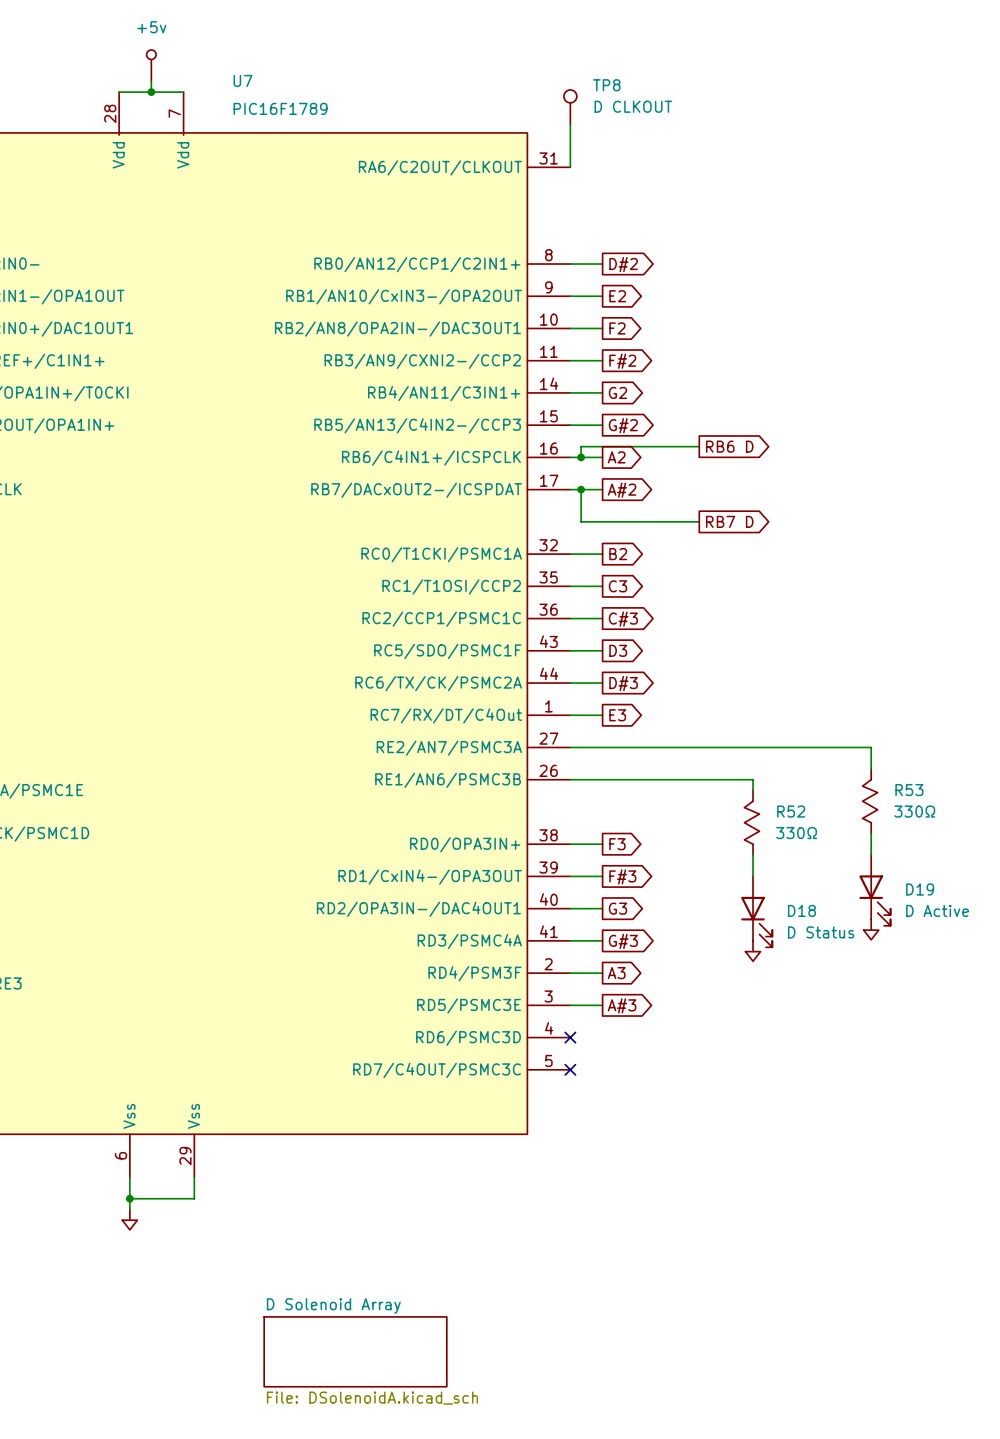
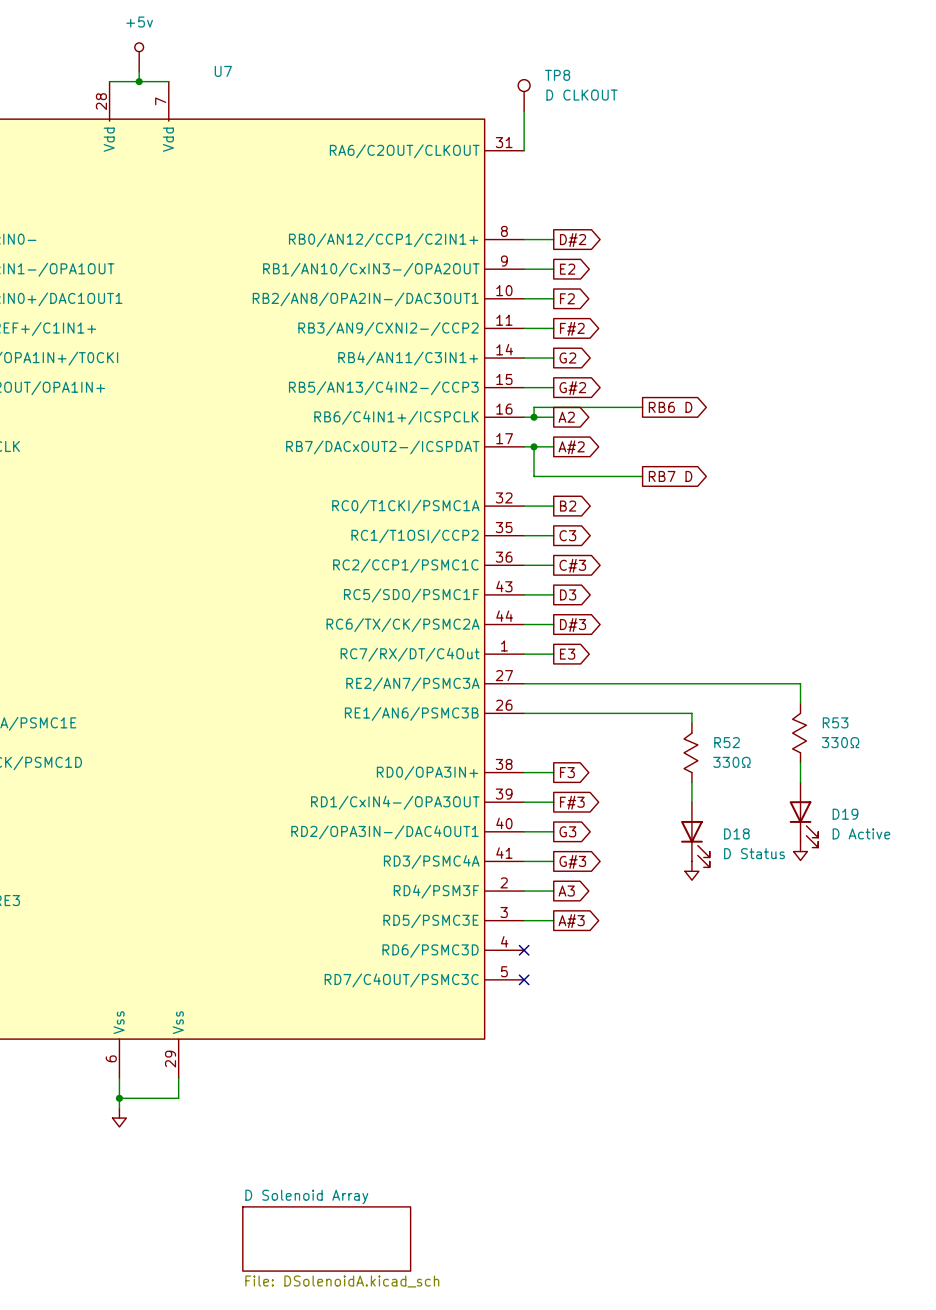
U7 value: PIC16F1789 (280, 108) -> none

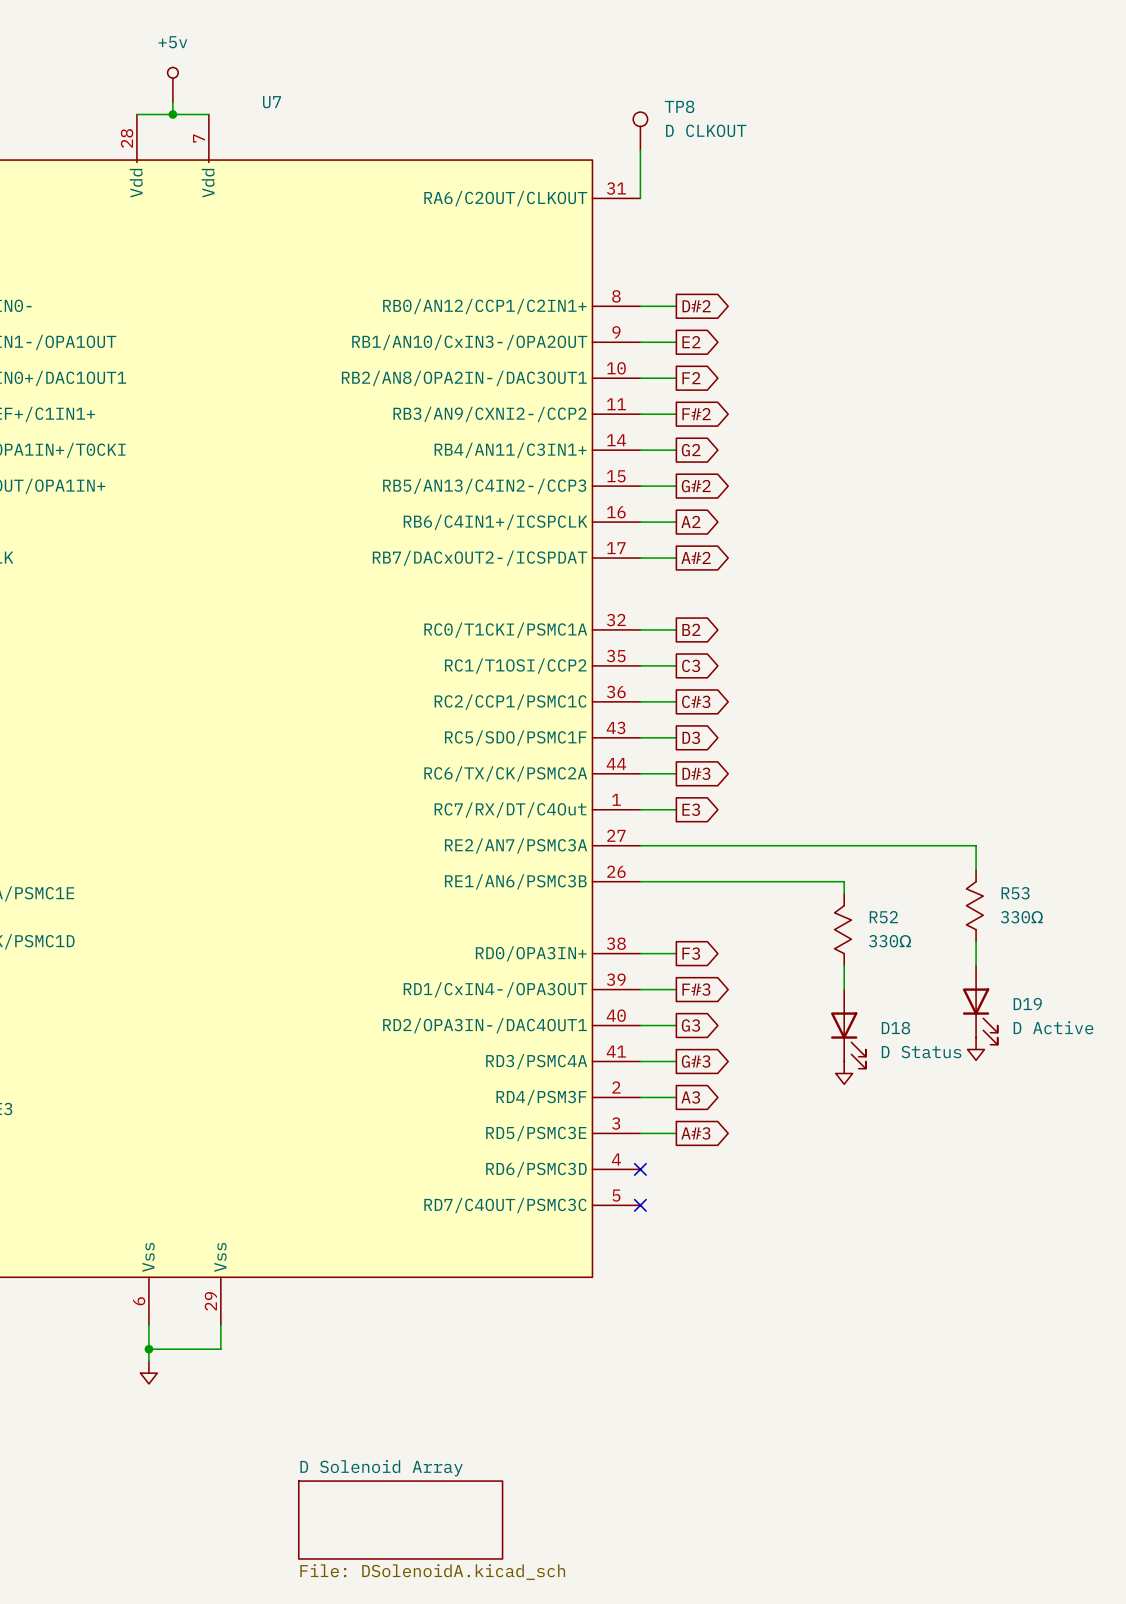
wire: (642, 407) (534, 407) (534, 417) -> none
global label: RB6 D (670, 407) -> none
junction: (534, 417) -> none
wire: (534, 446) (534, 476) (642, 476) -> none
junction: (534, 446) -> none
global label: RB7 D (670, 476) -> none

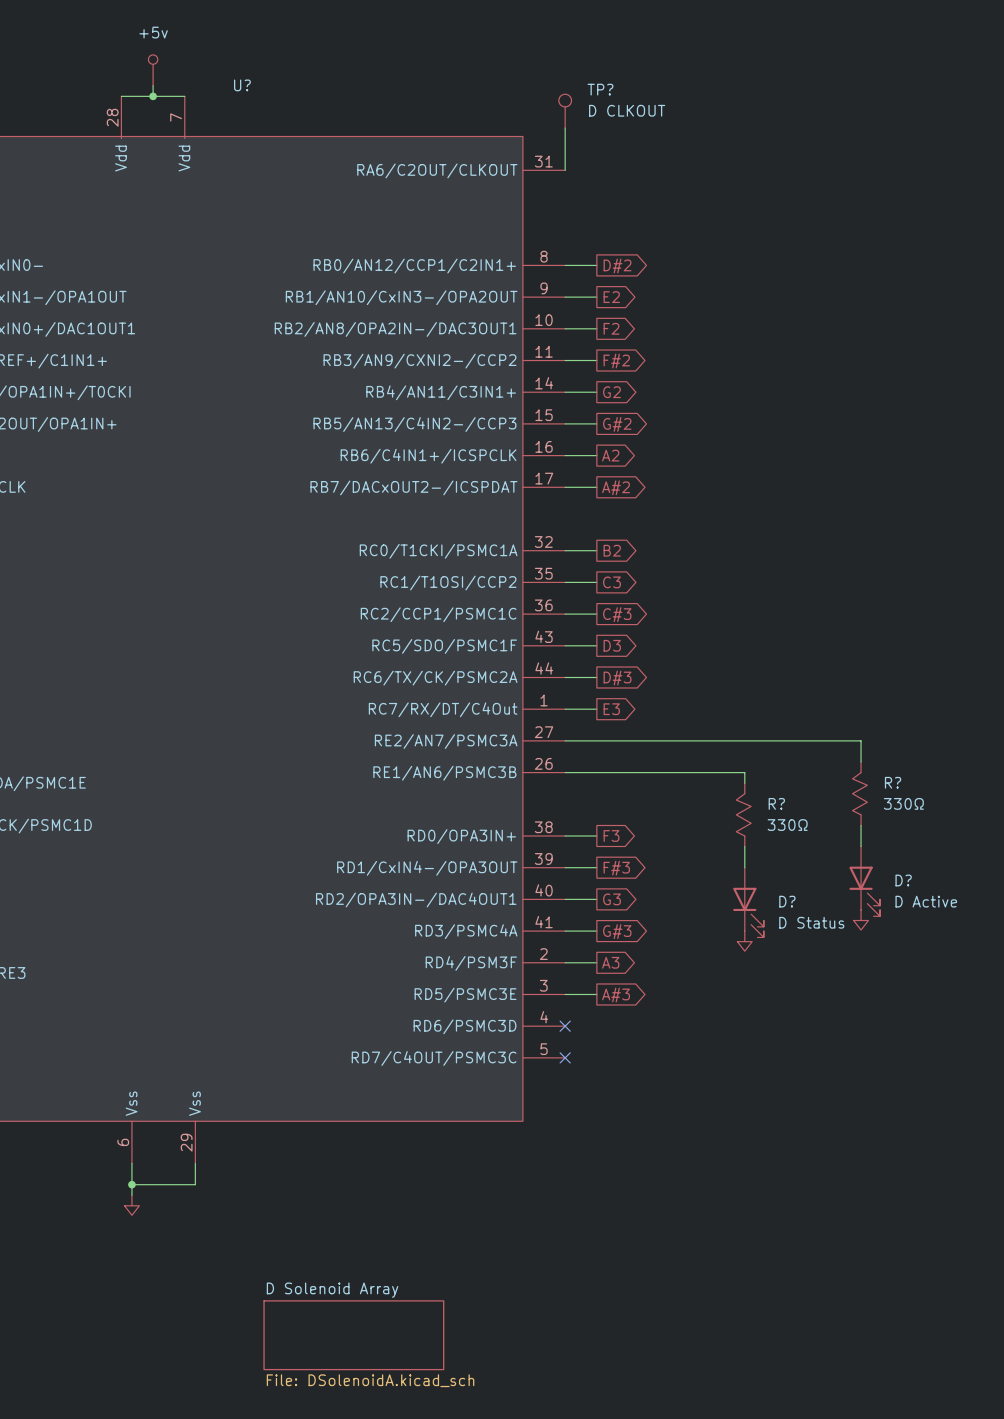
U7 name: U7 (272, 102) -> U? (242, 85)
TP8 name: TP8 (679, 106) -> TP? (600, 89)
R53 name: R53 (1015, 893) -> R? (893, 782)
R52 name: R52 (883, 917) -> R? (776, 803)
D19 name: D19 (1027, 1004) -> D? (903, 880)
D18 name: D18 (895, 1028) -> D? (787, 901)

